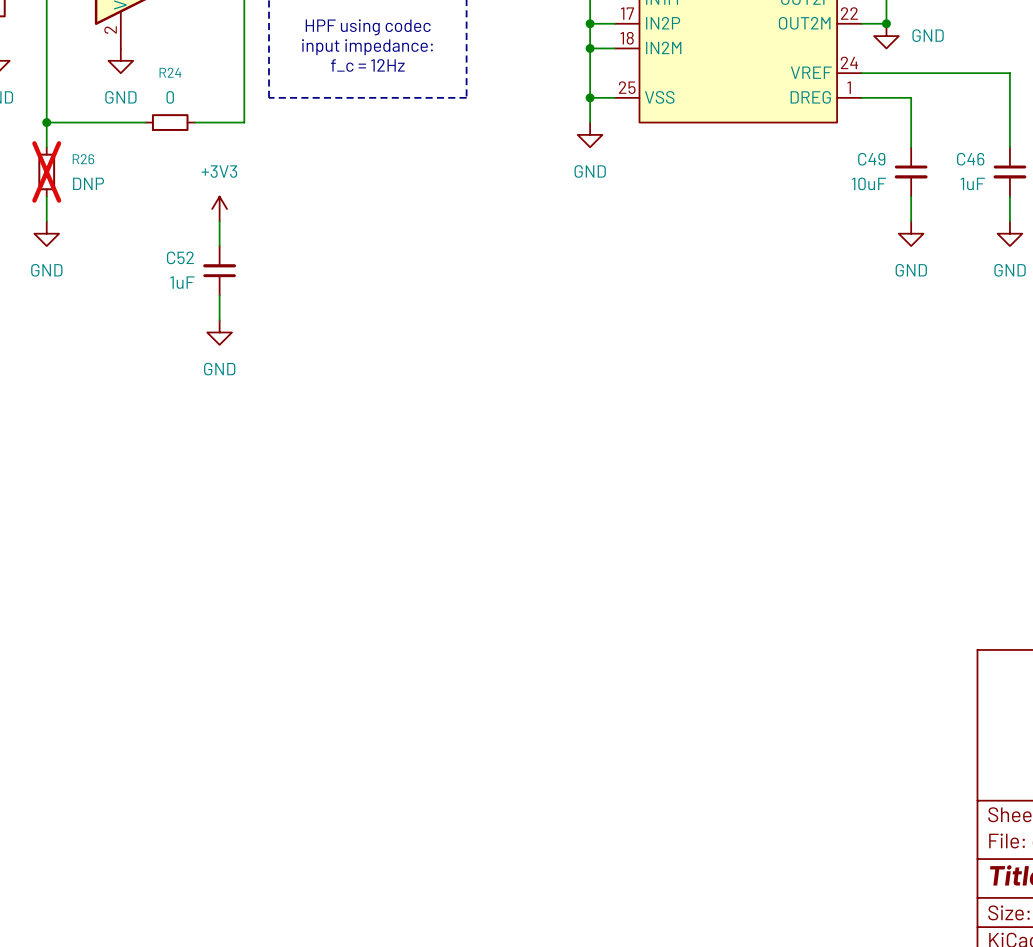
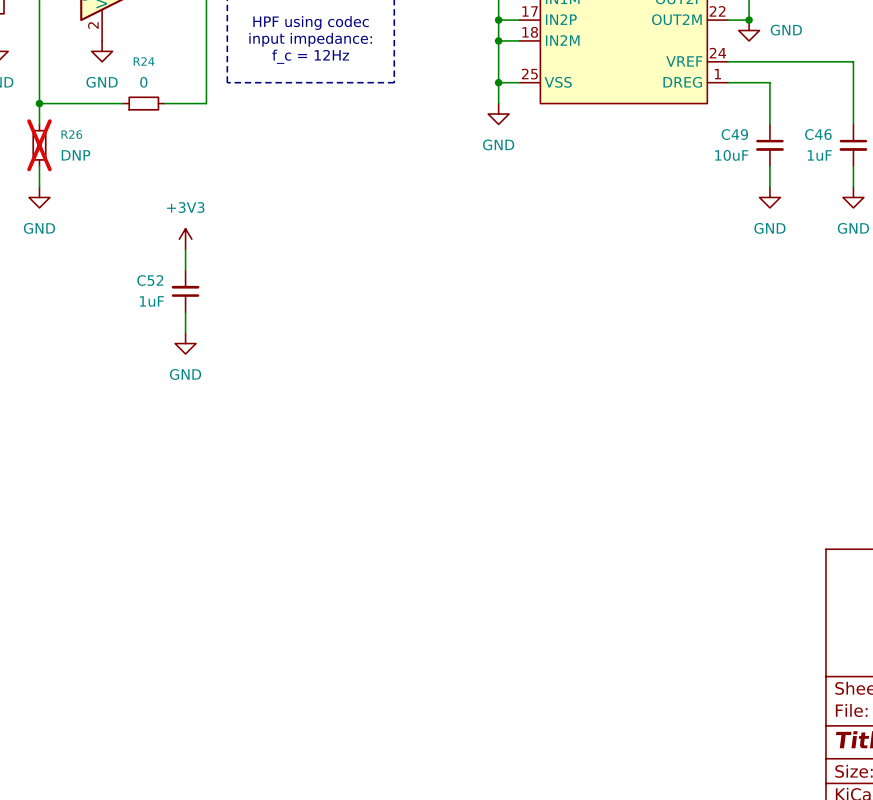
power symbol position: +3V3 (219, 209) -> +3V3 (185, 239)
wire: (219, 221) (219, 246) -> (185, 312) (185, 333)
C52 position: (219, 270) -> (185, 291)
power symbol position: GND (219, 332) -> GND (185, 343)

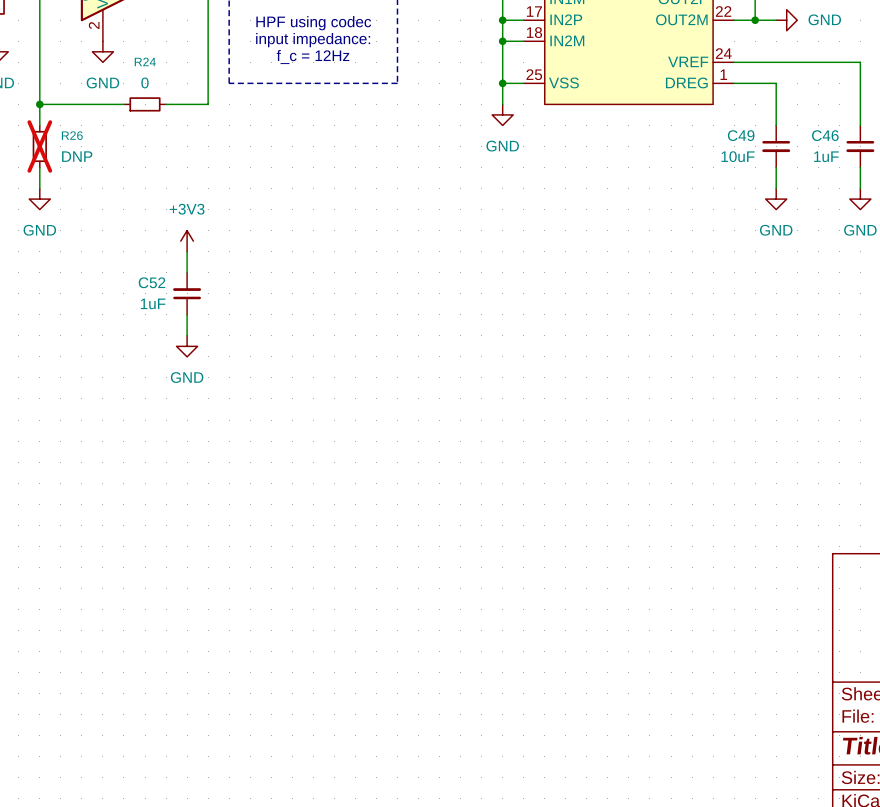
wire: none -> (755, 20) (776, 20)
power symbol rotation: 0° (749, 30) -> 90° counterclockwise (786, 20)
power symbol position: GND (749, 30) -> GND (786, 20)

